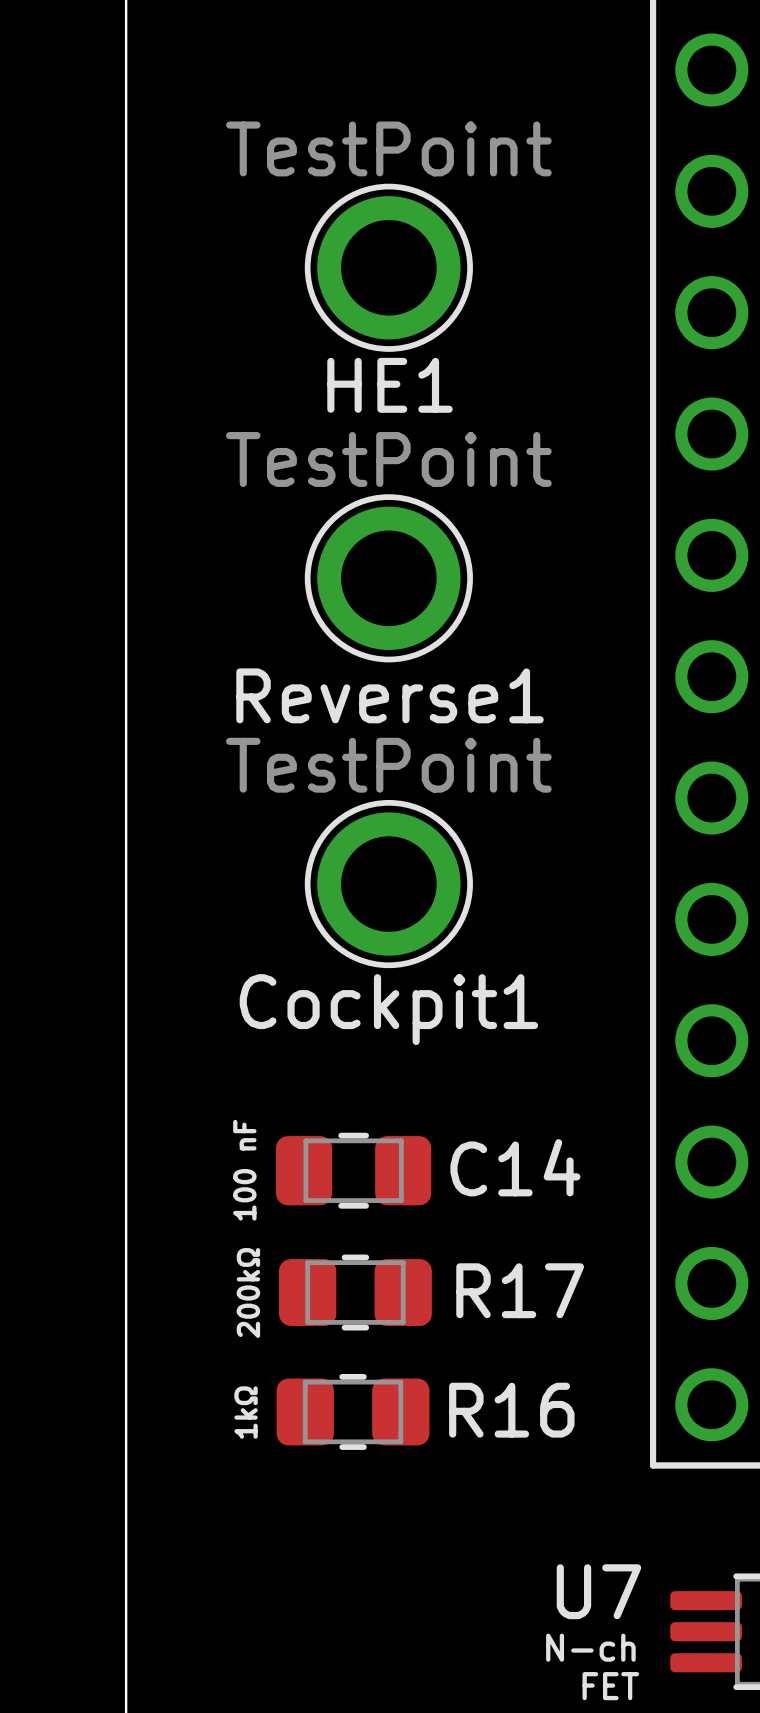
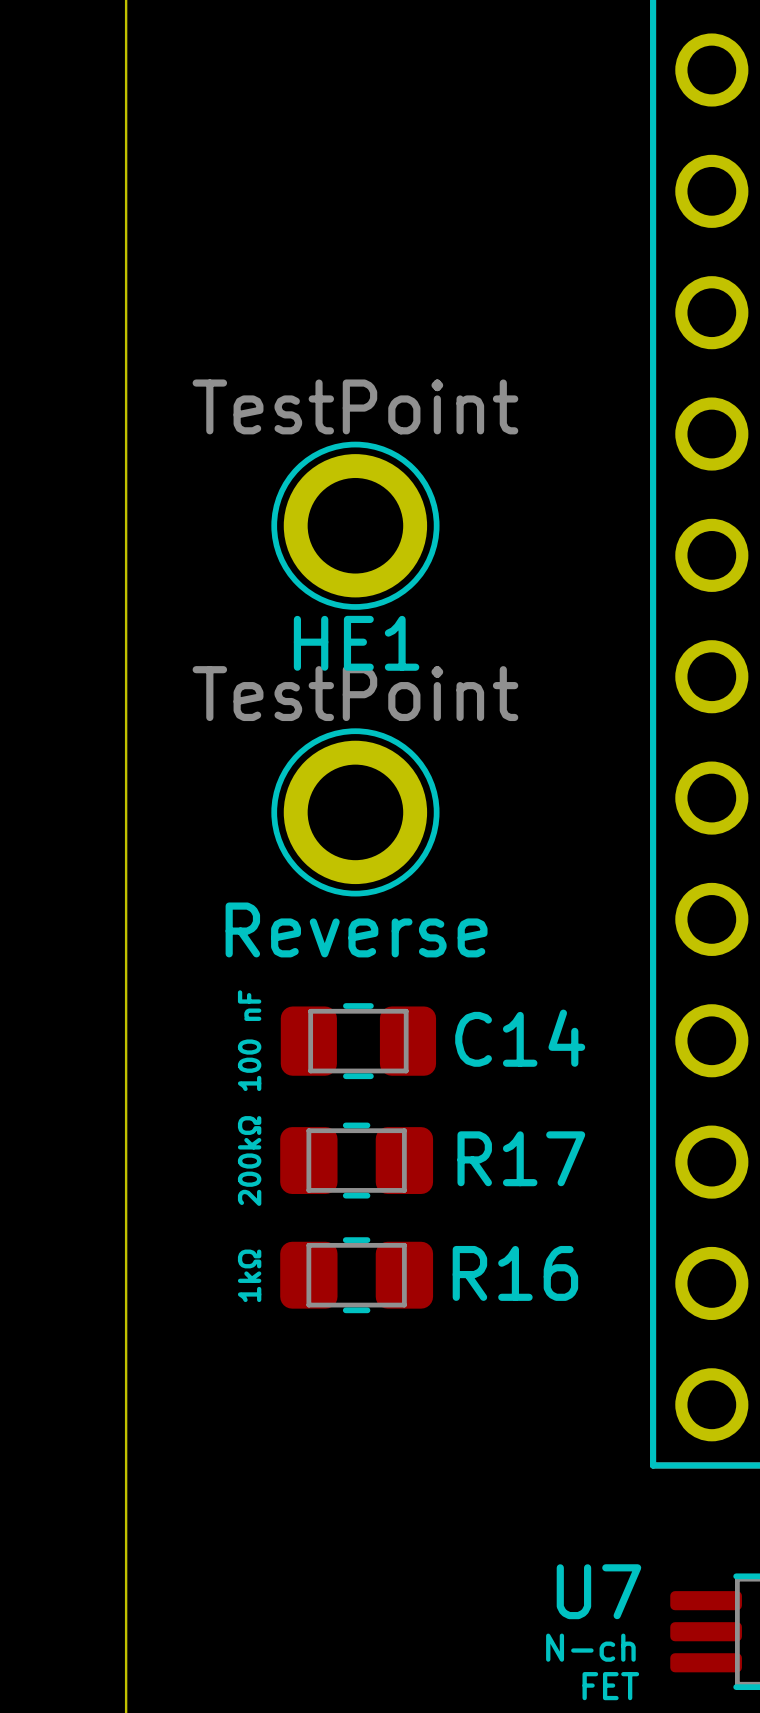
HE1 position: (388, 267) -> (355, 525)
Reverse1: TestPoint (388, 578) -> none
Reverse: none -> TestPoint (355, 812)
Cockpit1: TestPoint (388, 884) -> none
C14 position: (353, 1170) -> (358, 1041)
R17 position: (355, 1292) -> (356, 1160)
R16 position: (353, 1411) -> (356, 1275)

